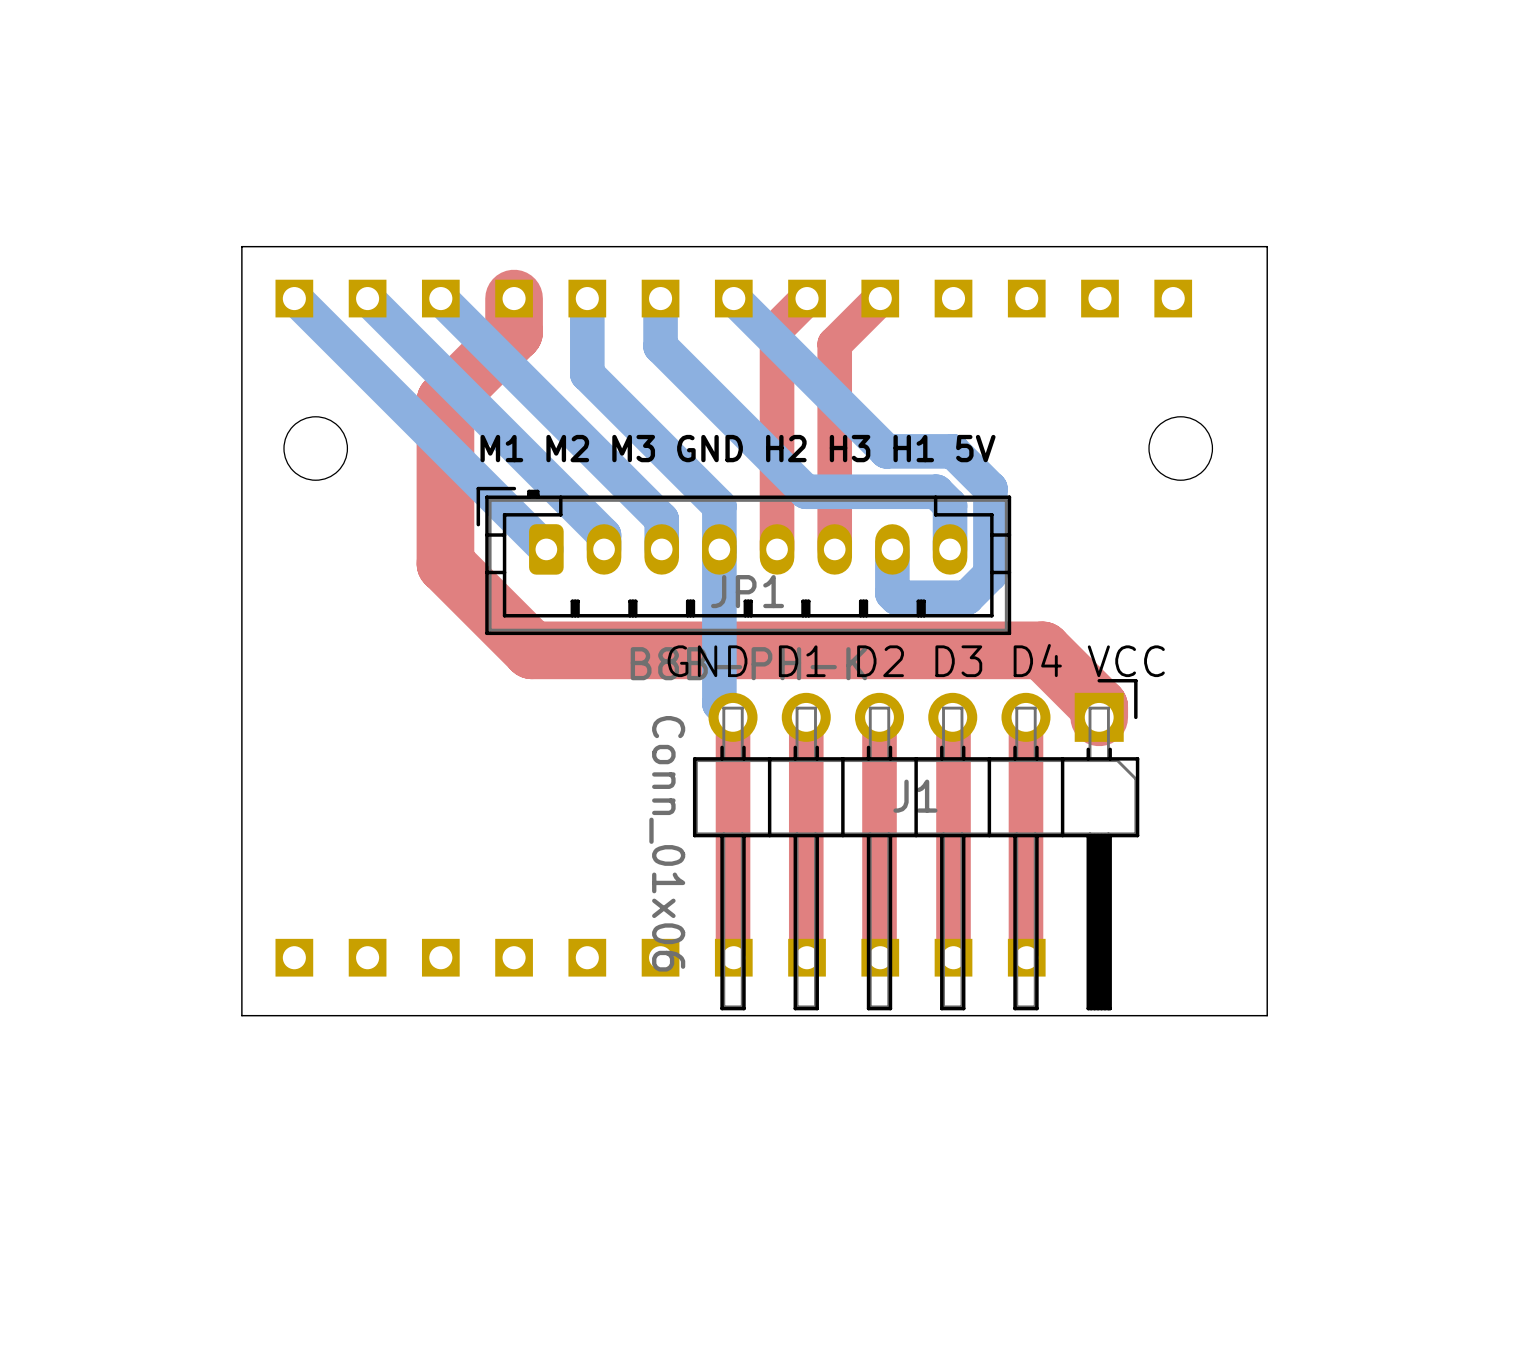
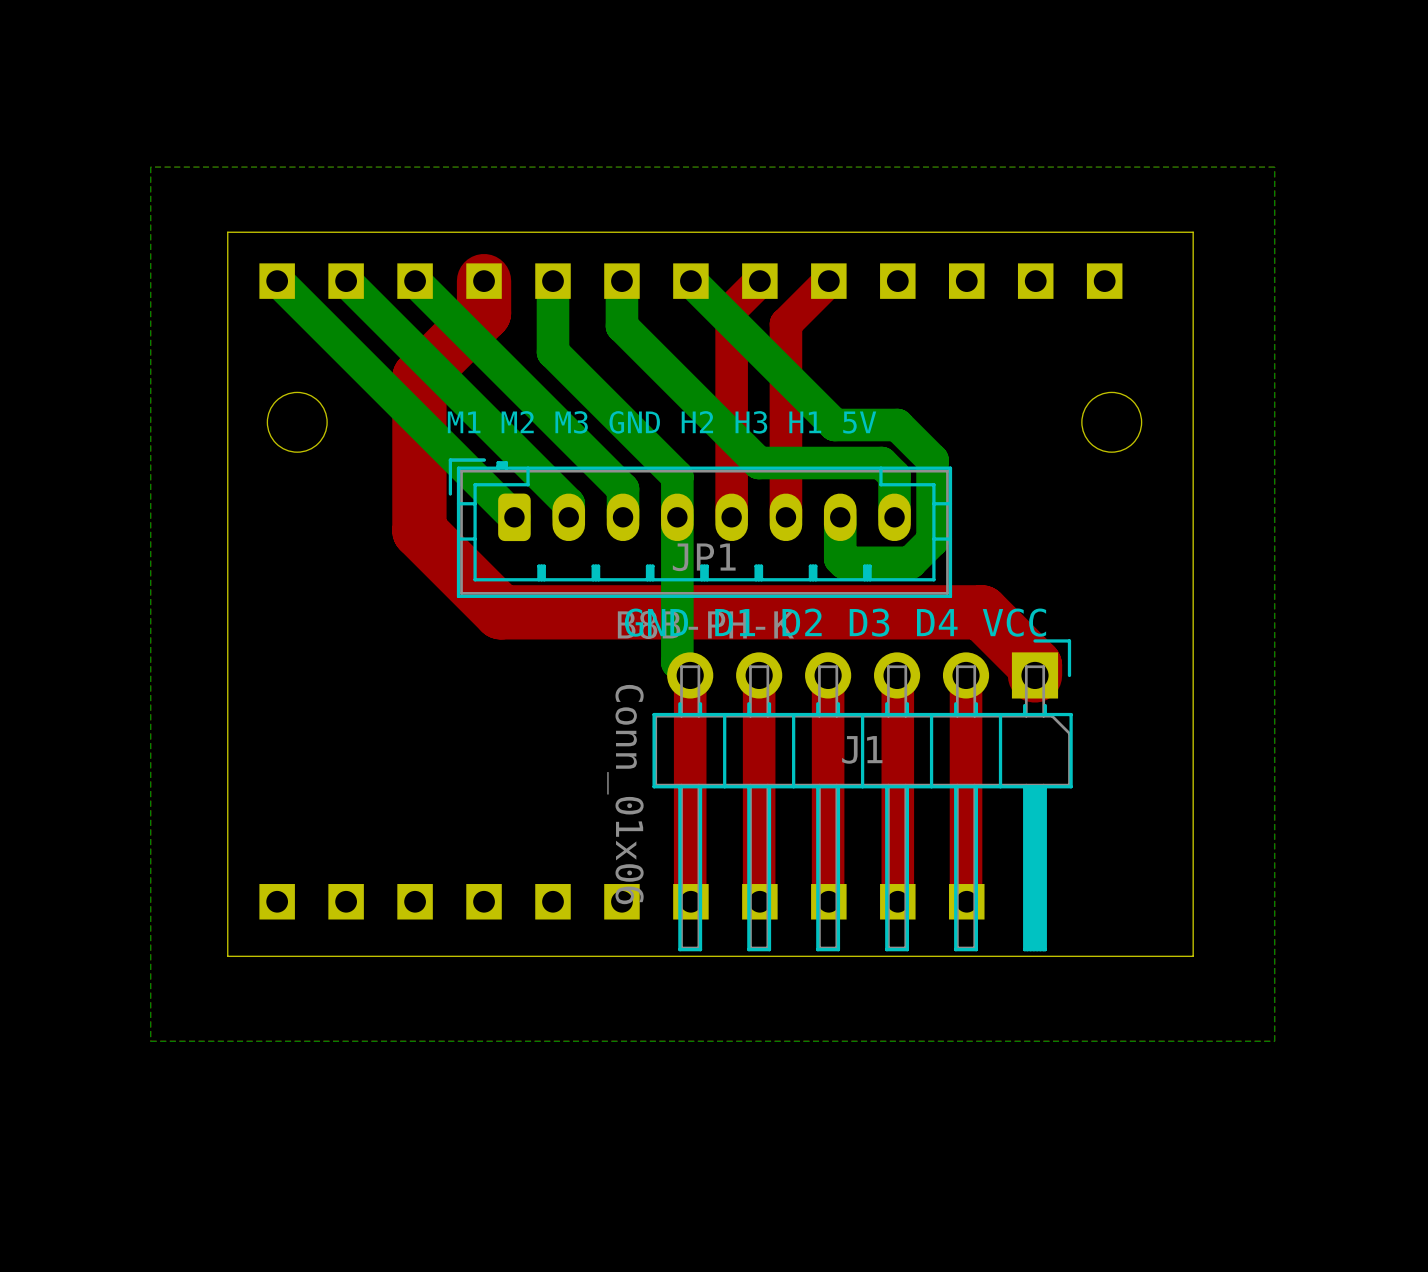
bottom zone outline: none -> (1274, 167) (150, 167) (150, 1041) (1274, 1041) (1274, 167)

